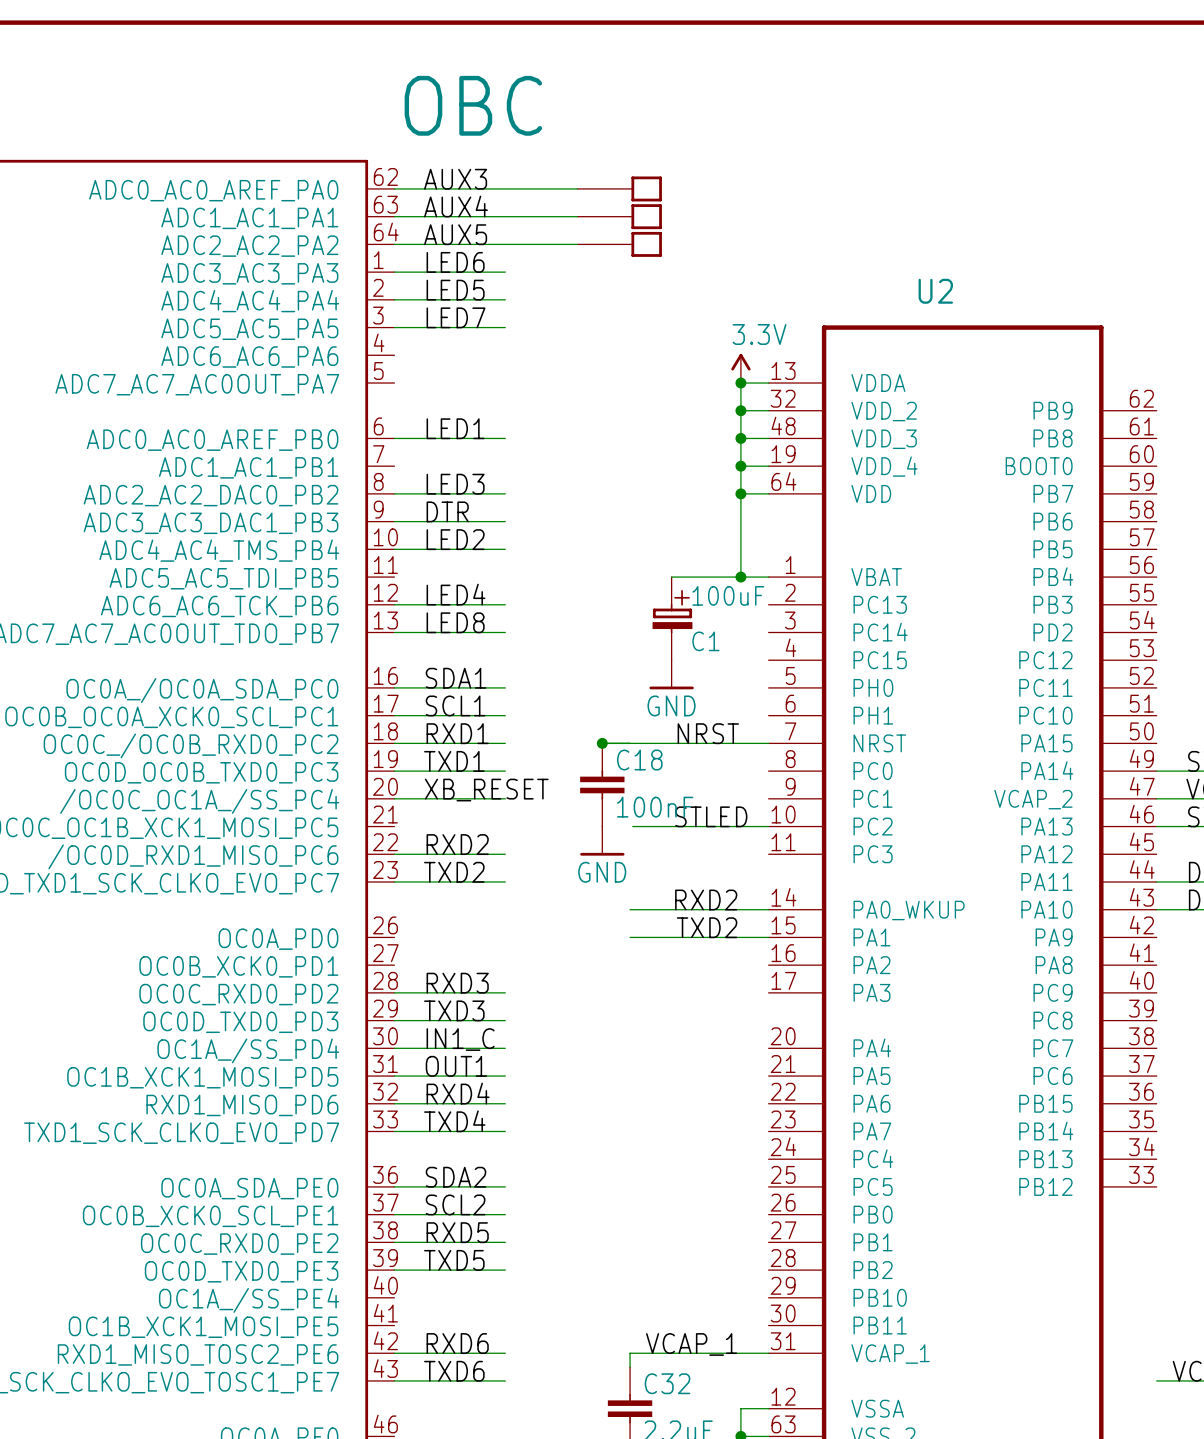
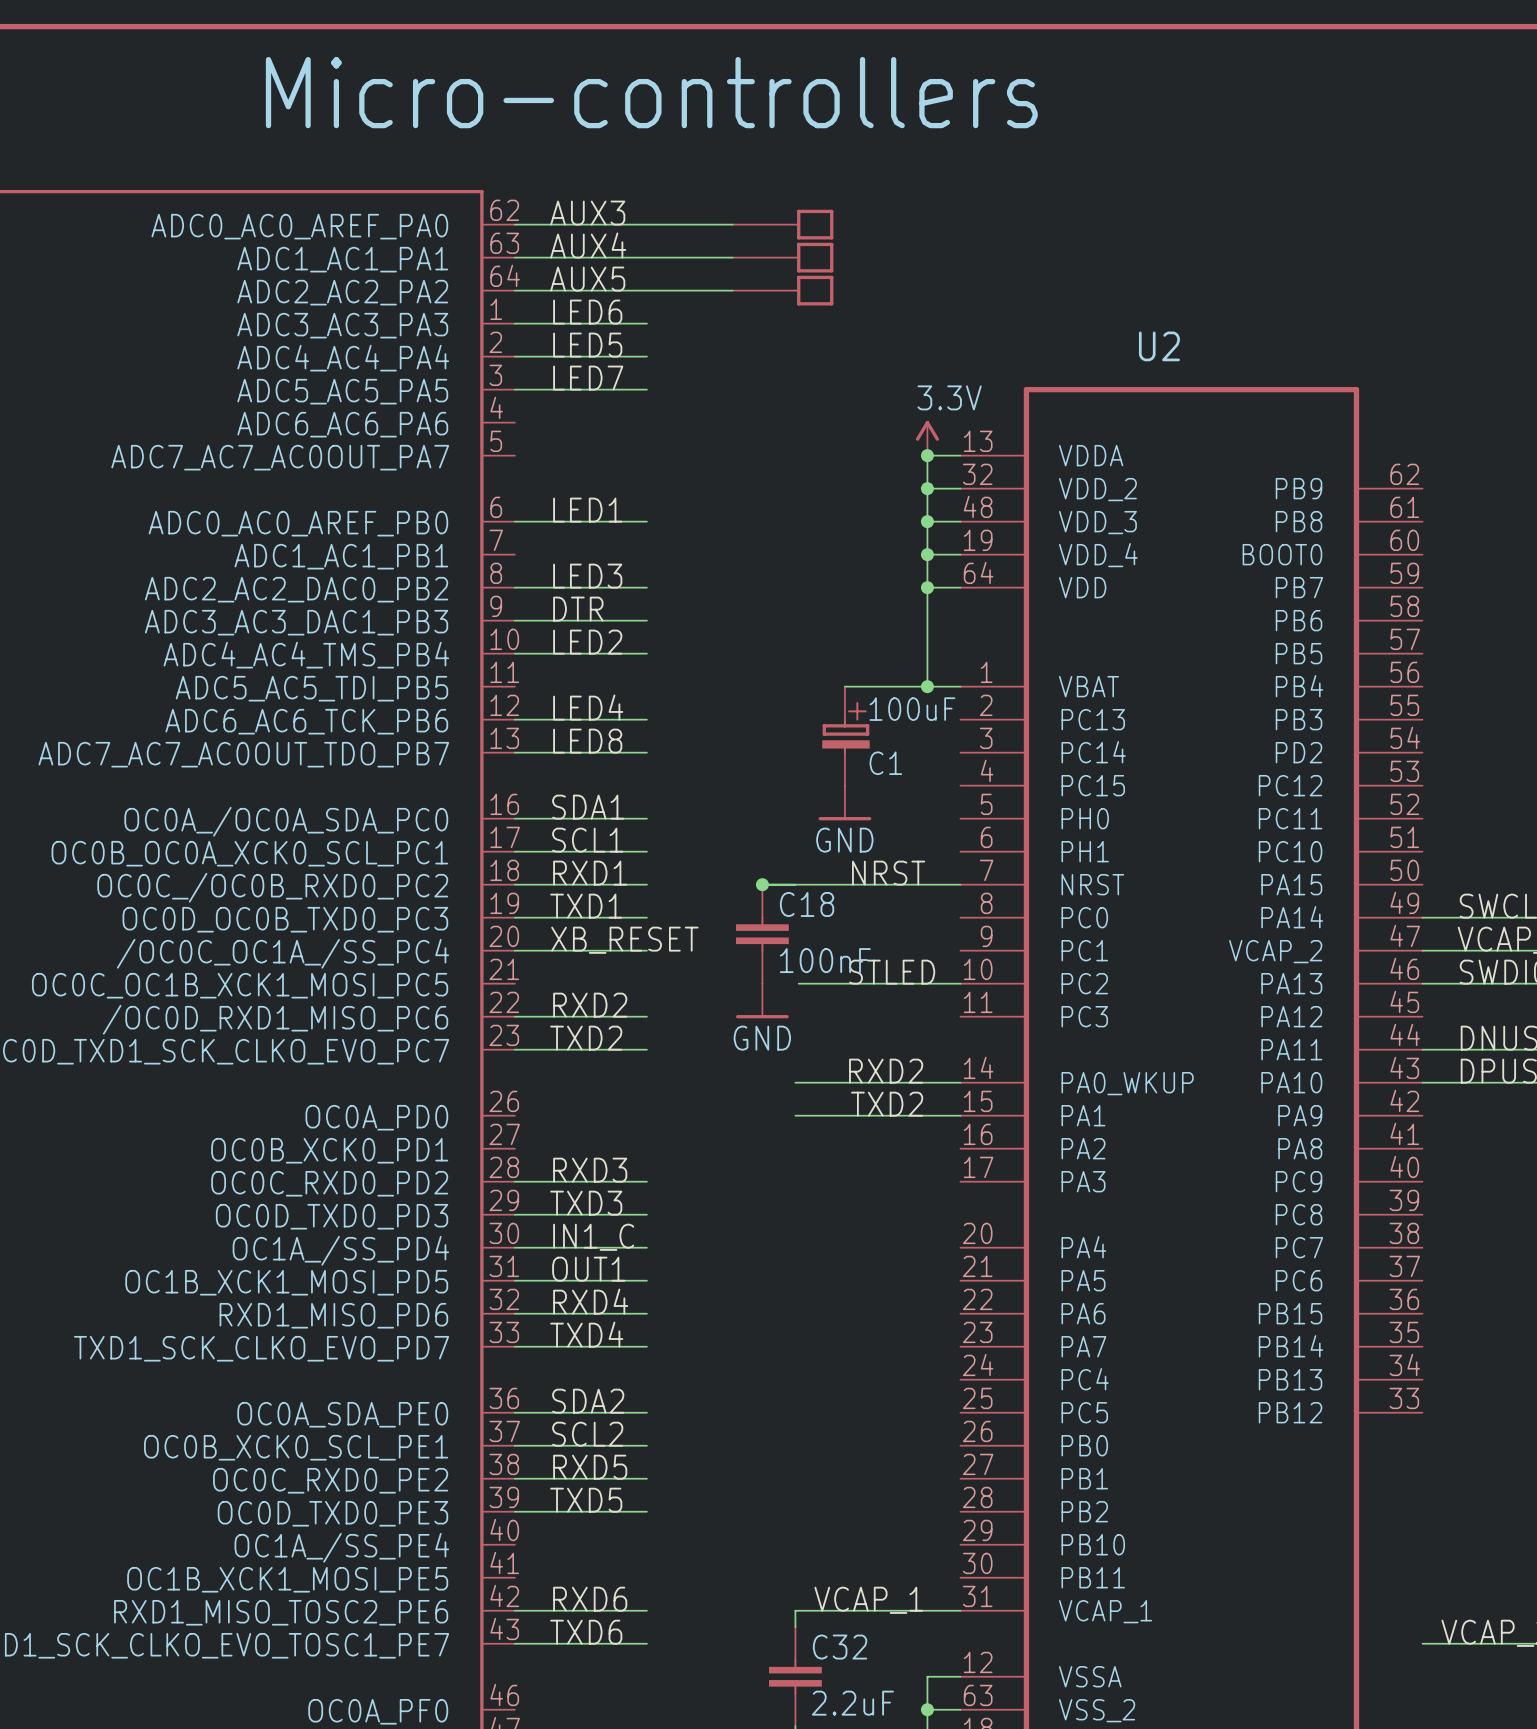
text: none -> Micro-controllers (651, 92)
text: OBC (473, 105) -> none

